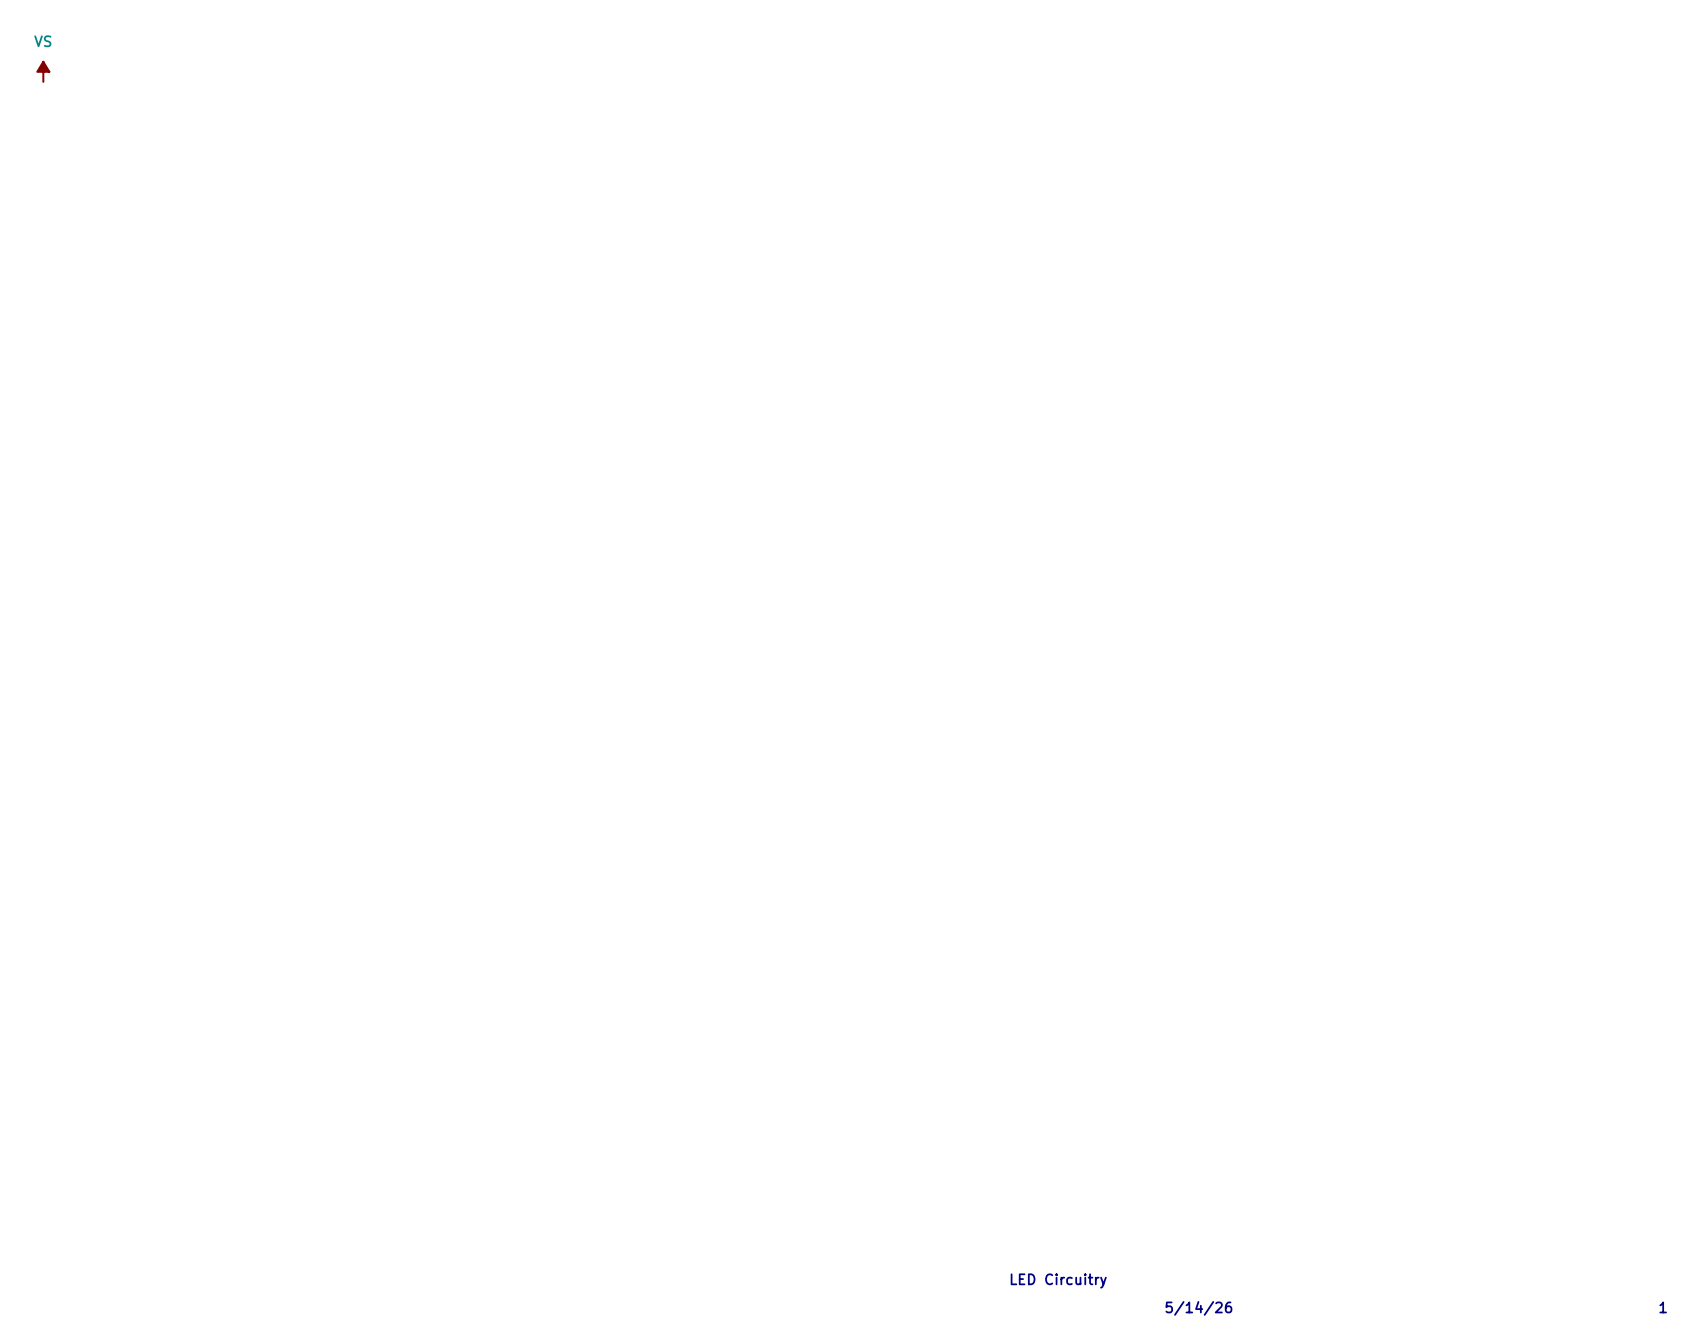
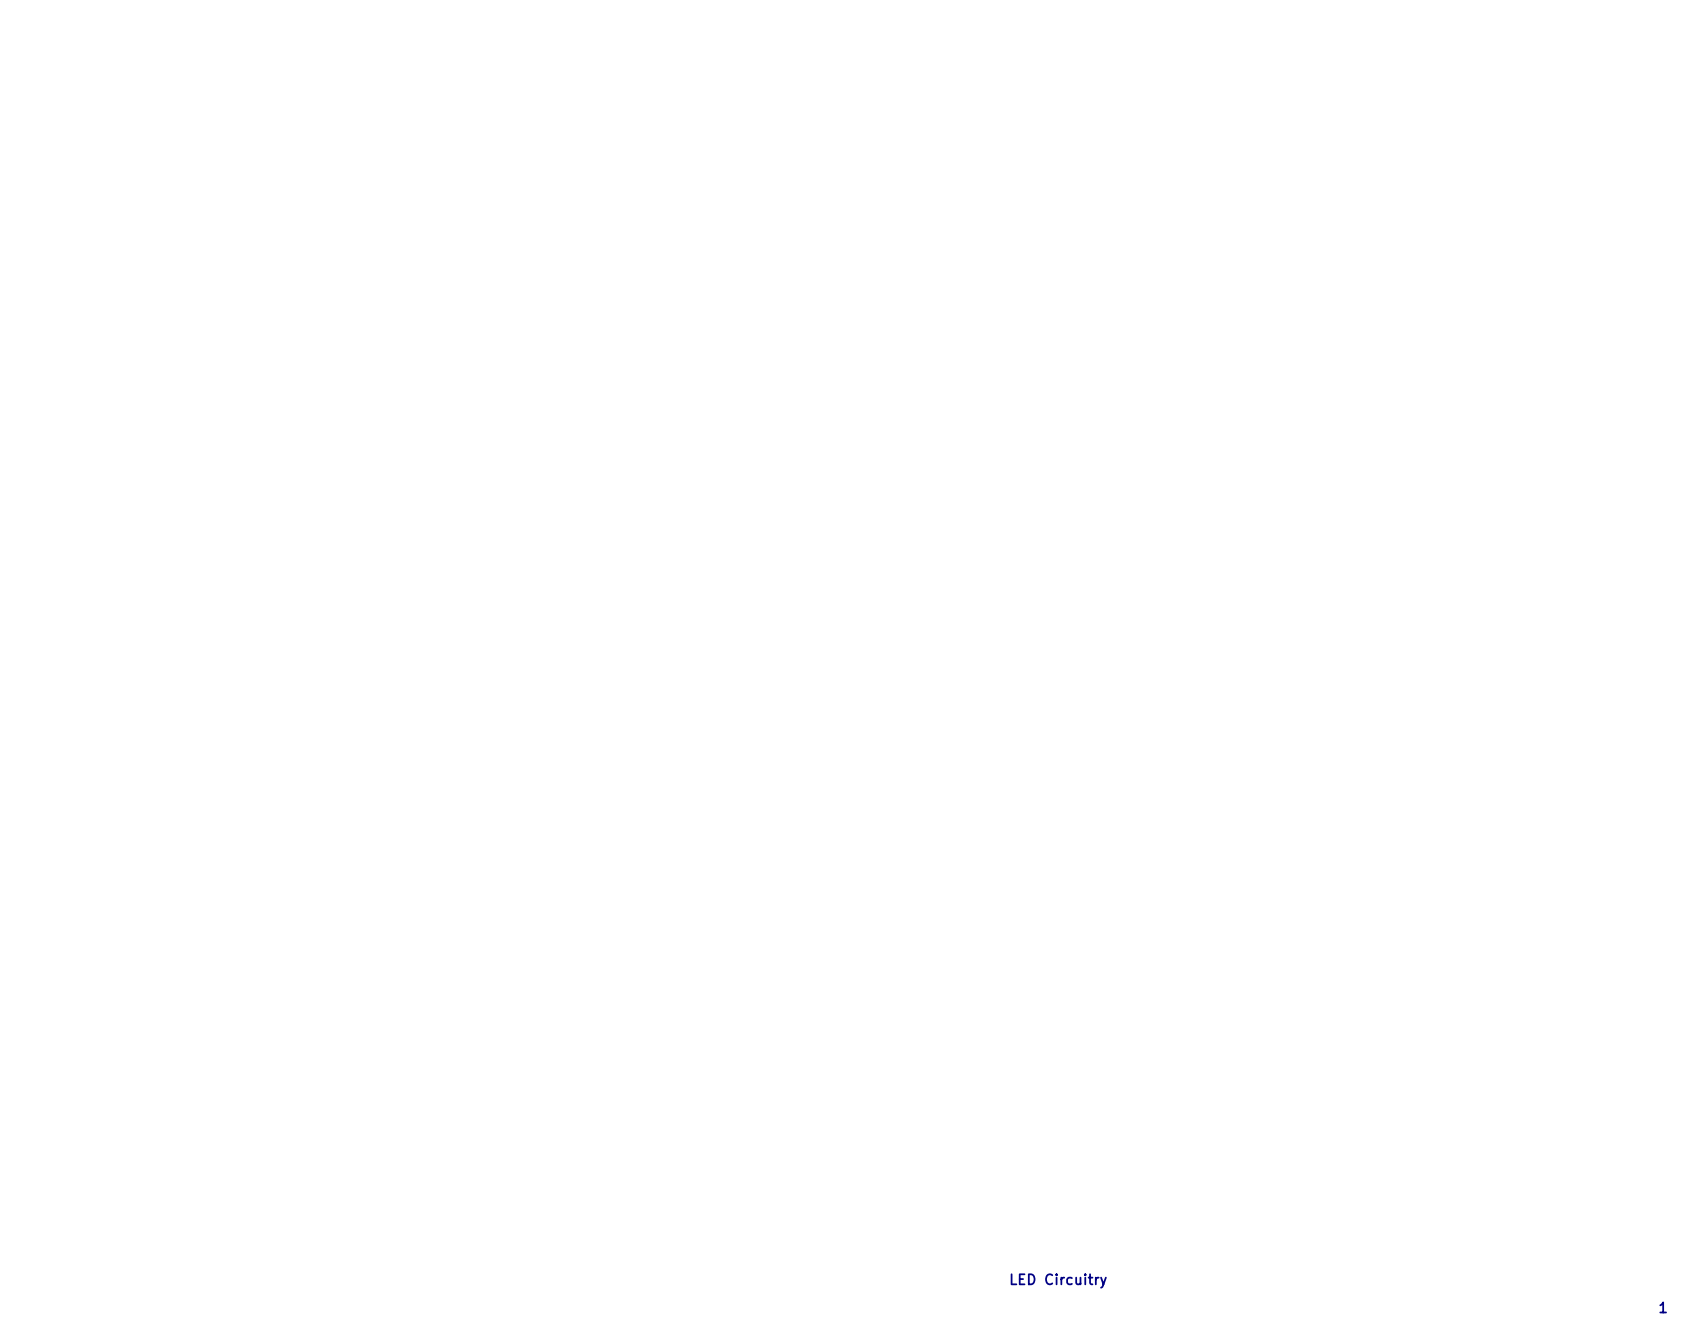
power symbol: VS (43, 71) -> none
text: 5/14/26 (1198, 1308) -> none

